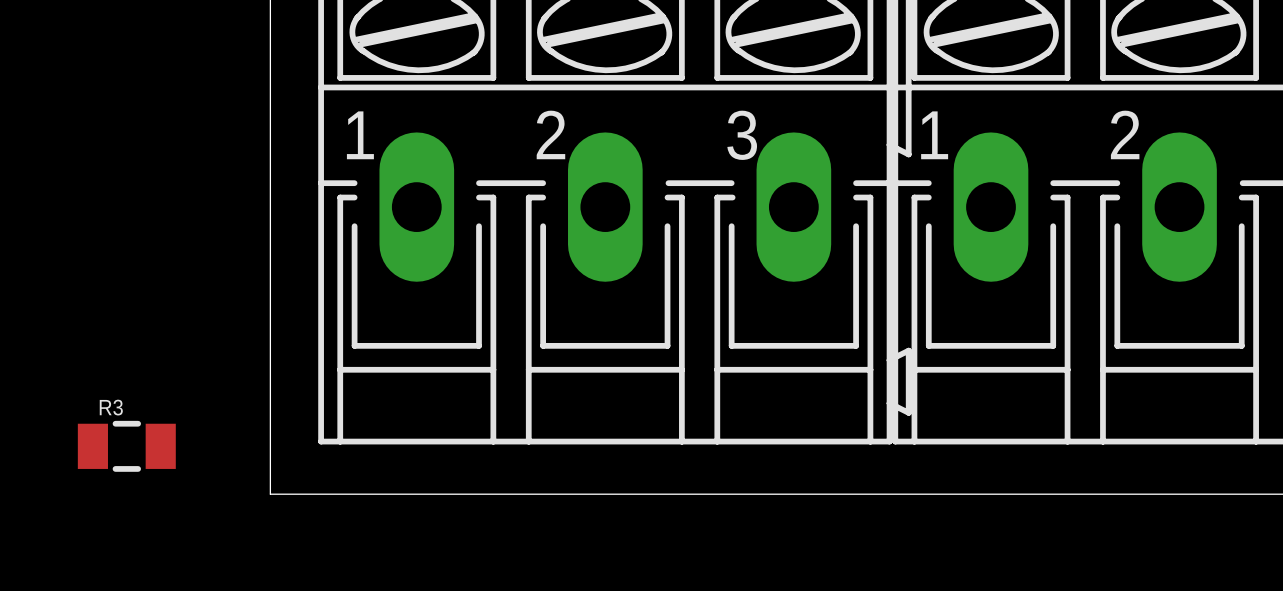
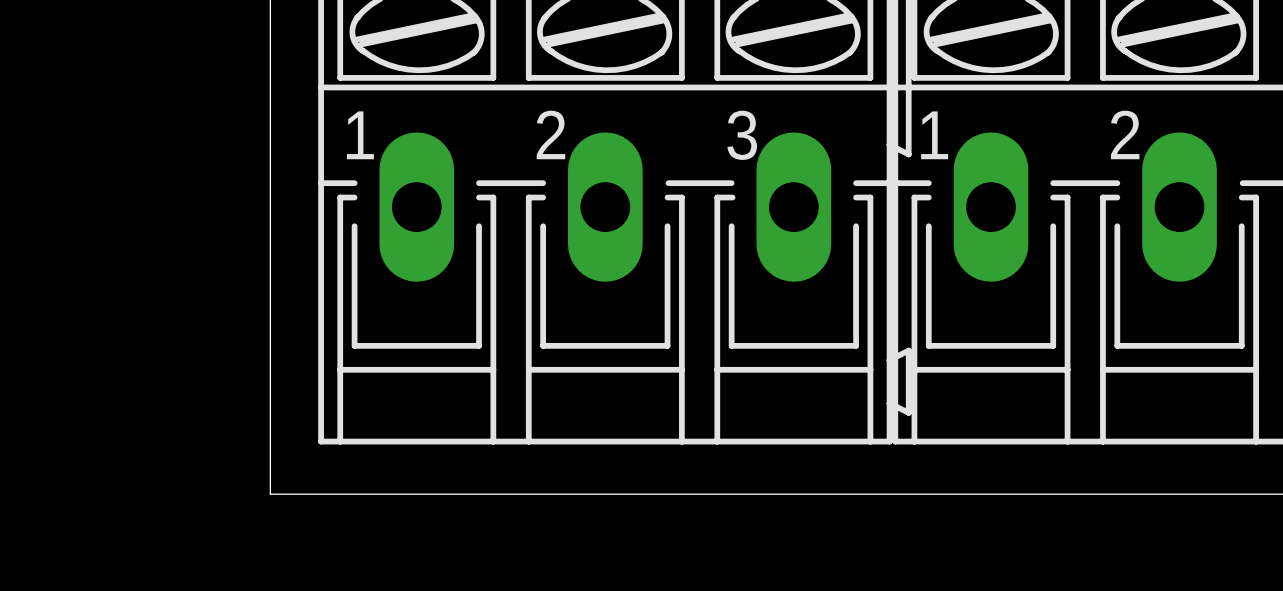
R3: (126, 446) -> none

